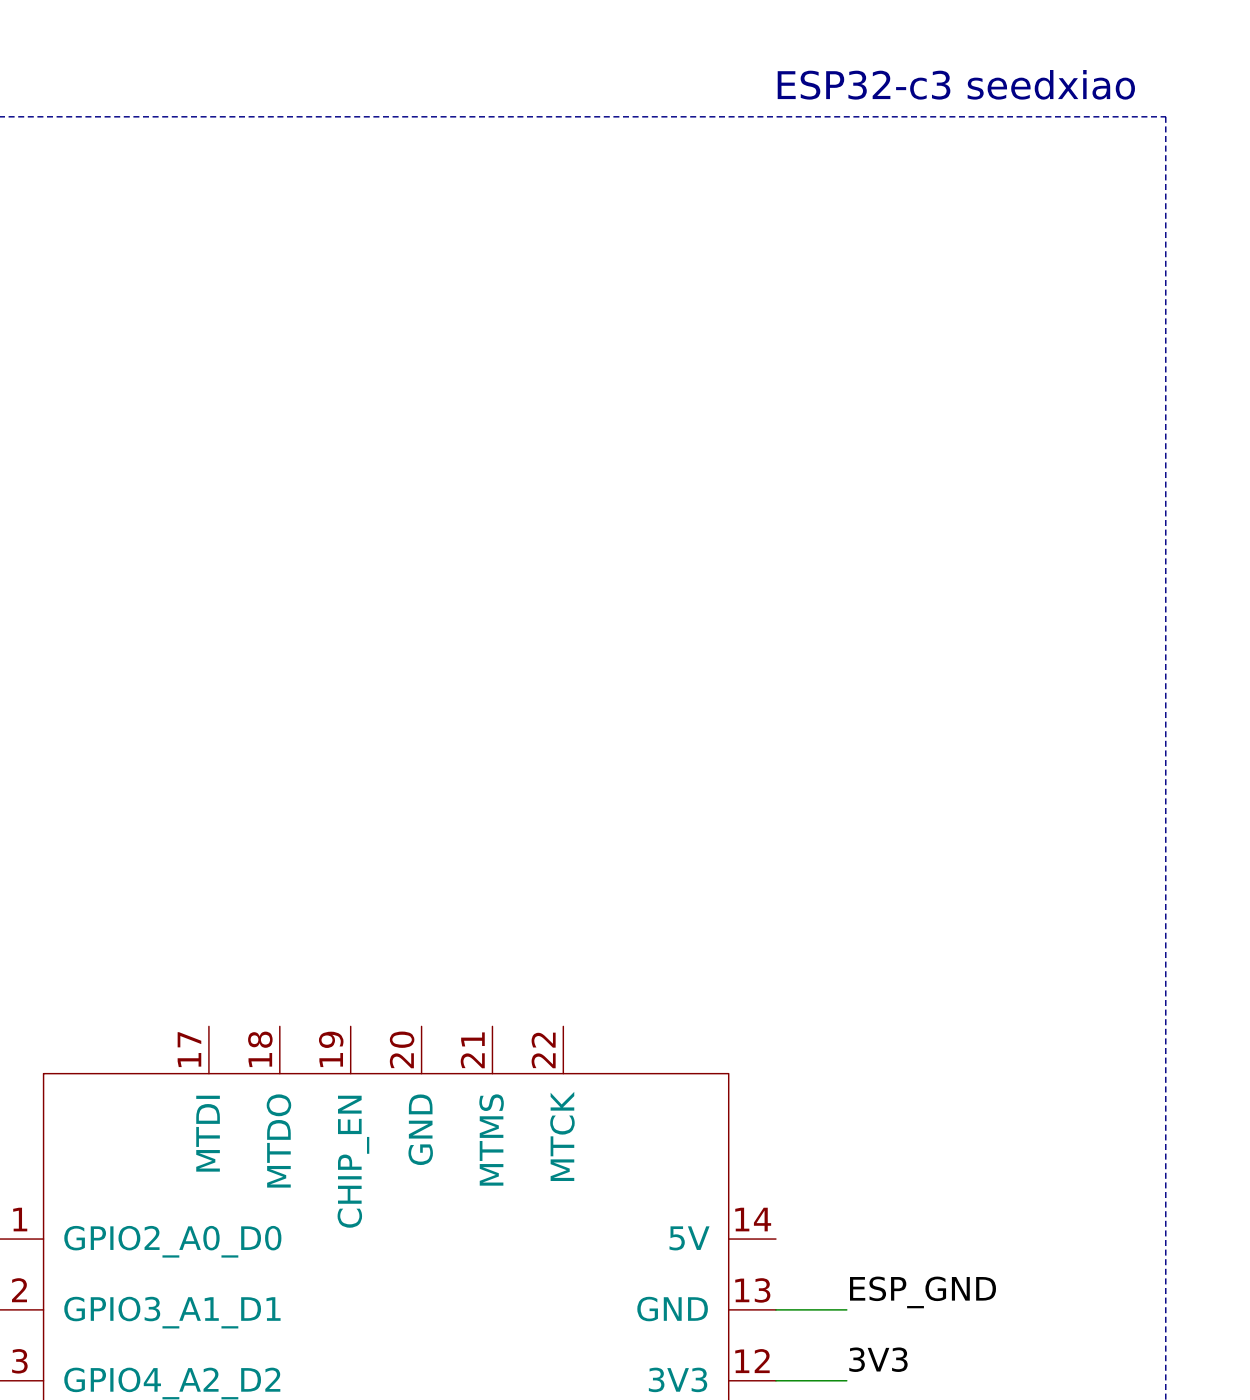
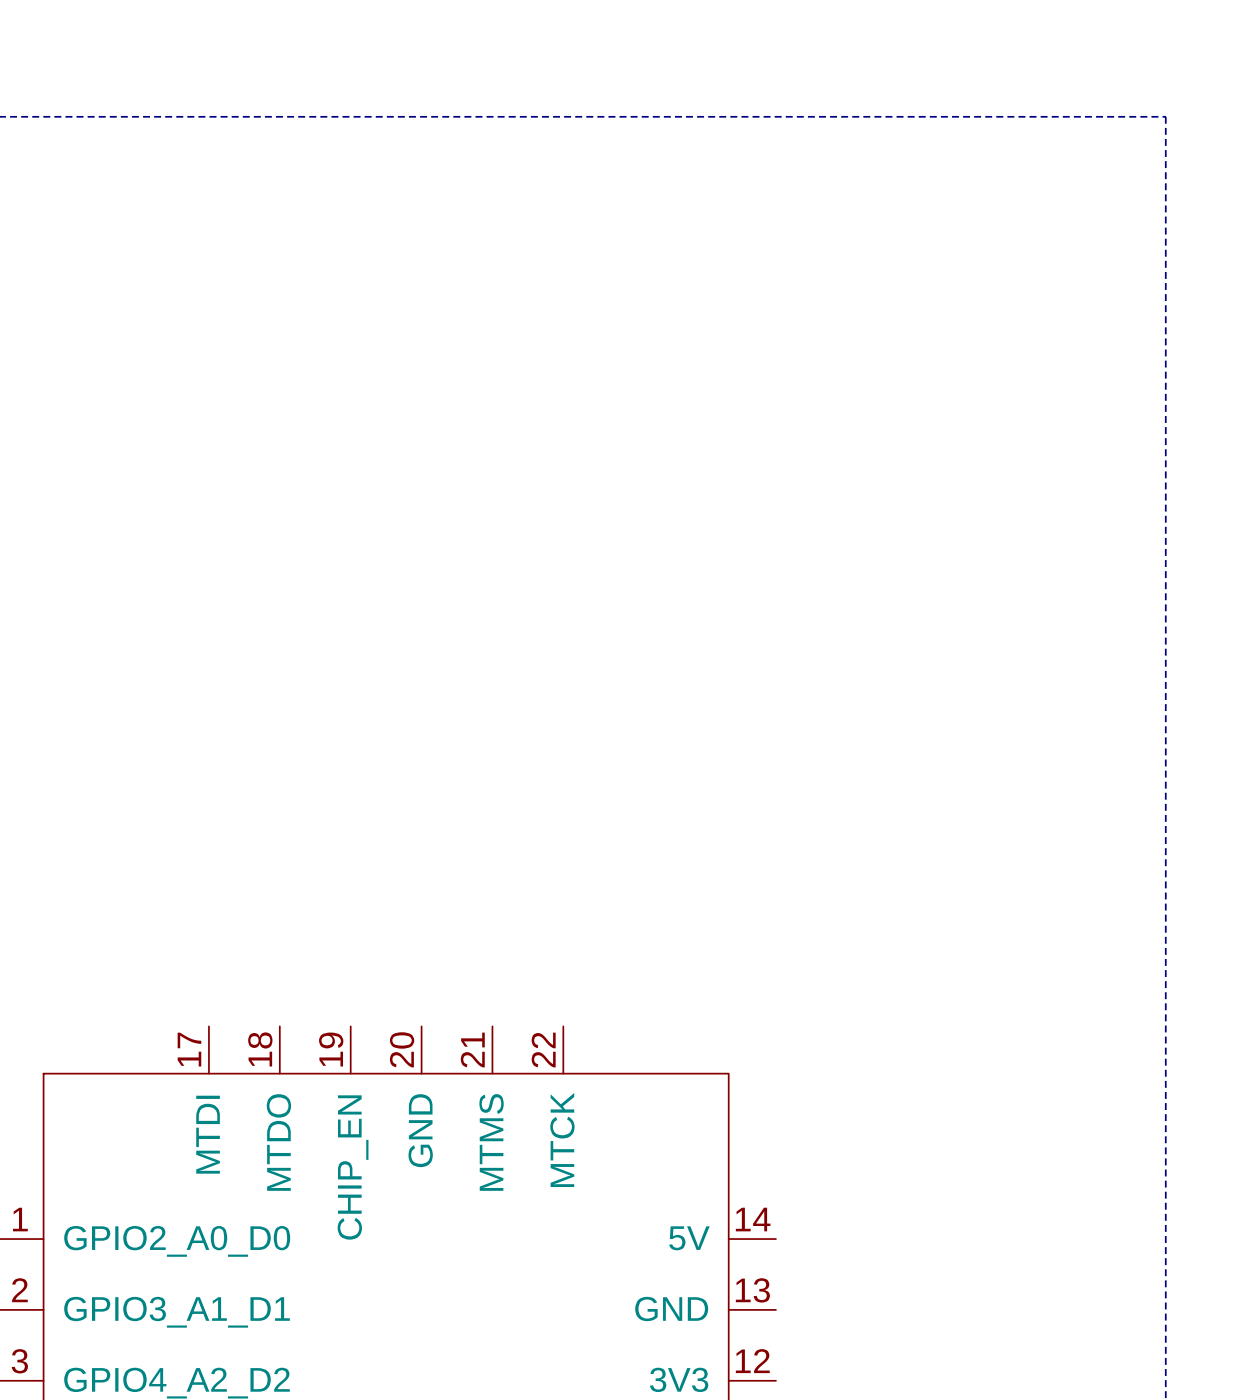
text: ESP32-c3 seedxiao (956, 84) -> none
label: ESP_GND (923, 1292) -> none
wire: (775, 1309) (846, 1309) -> none
label: 3V3 (878, 1359) -> none
wire: (775, 1380) (846, 1380) -> none

